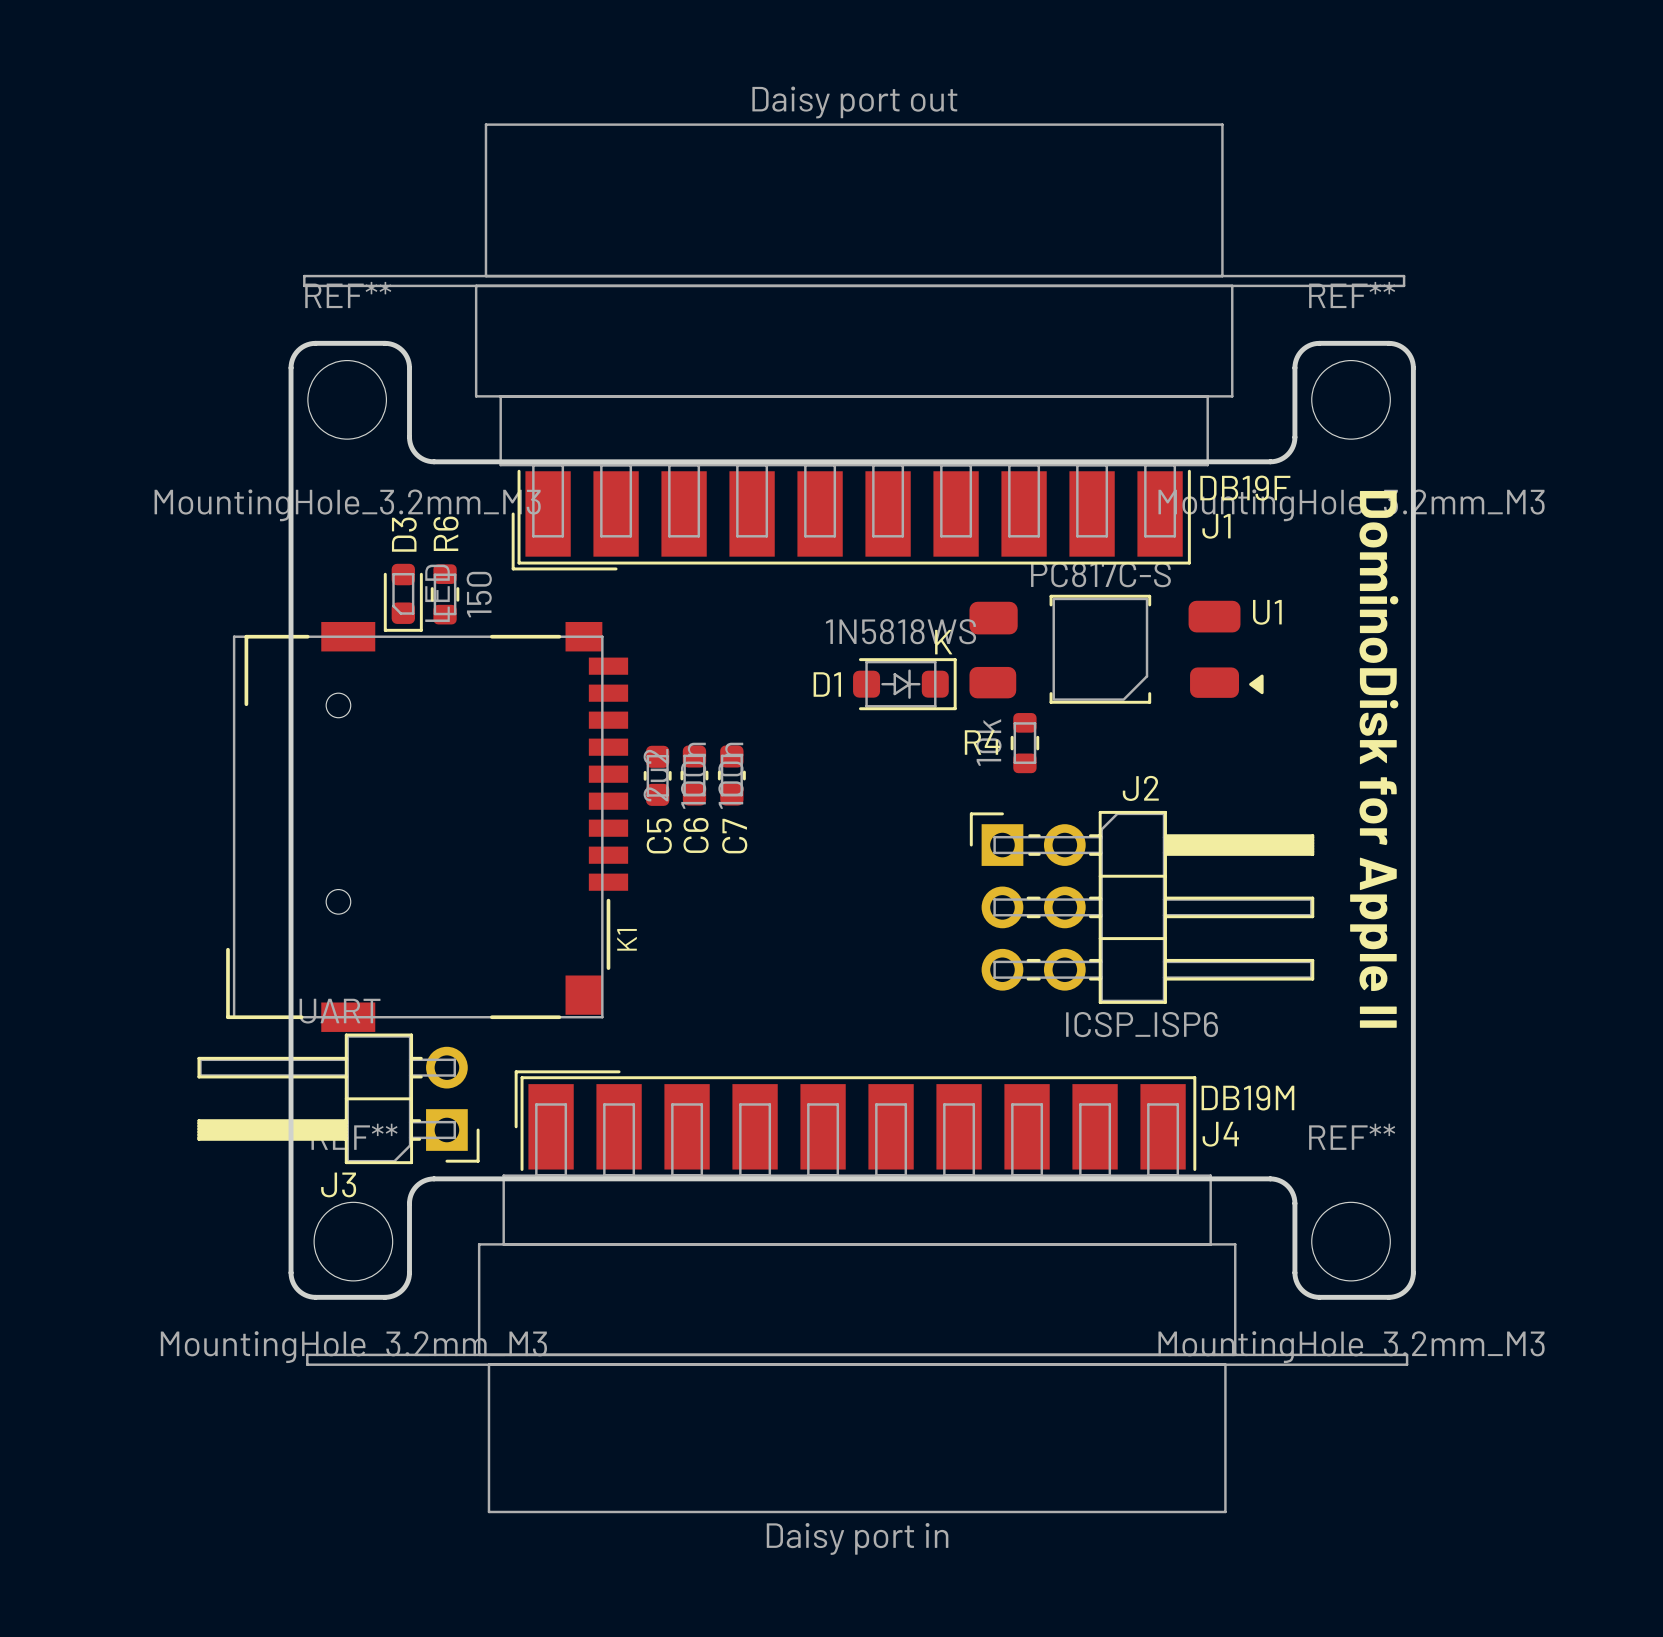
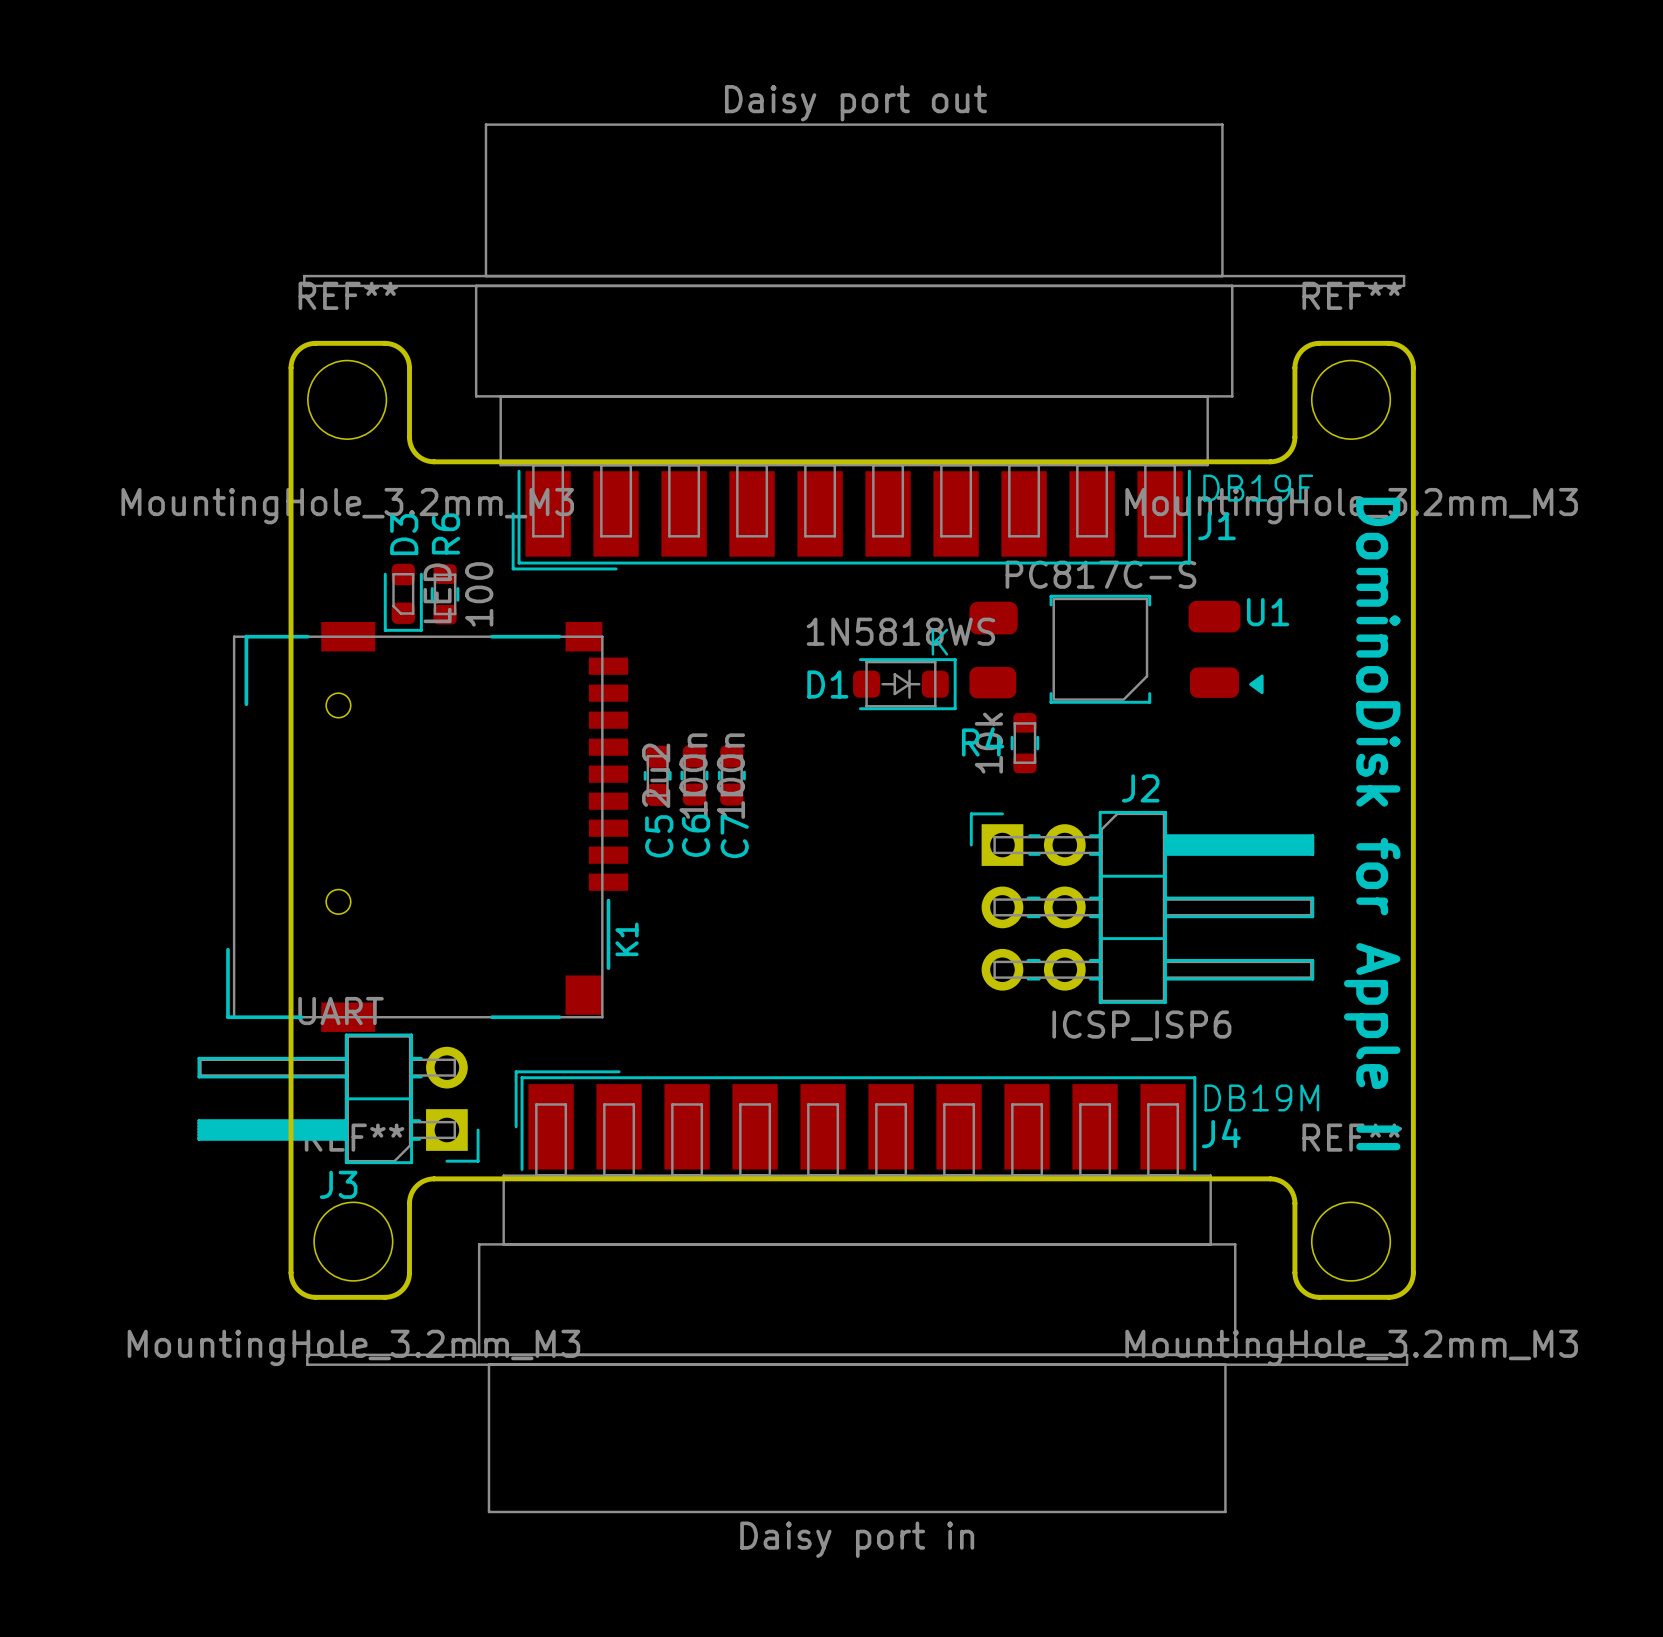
R6 value: 150 (479, 594) -> 100 (479, 594)

